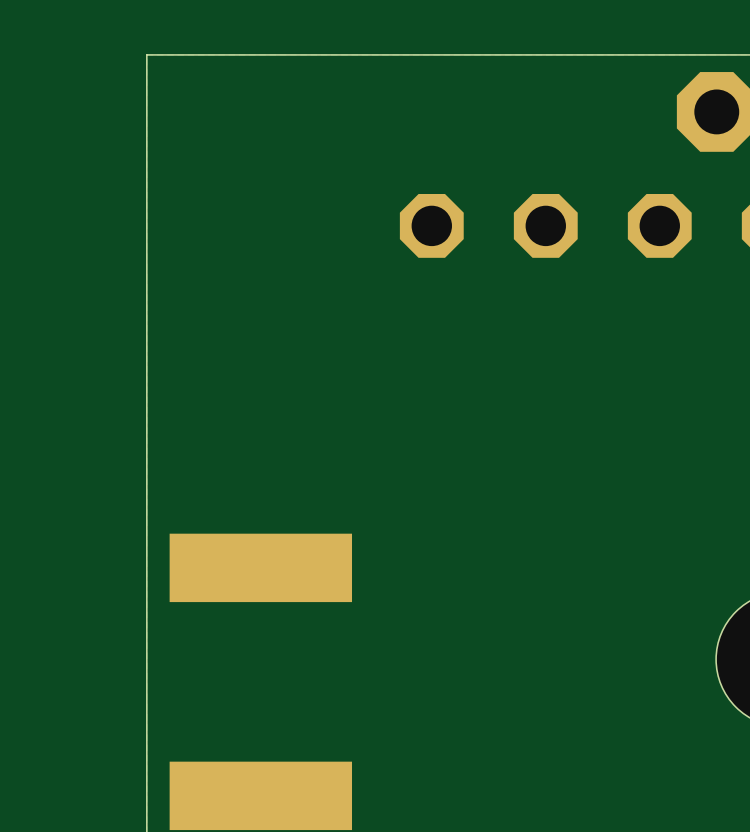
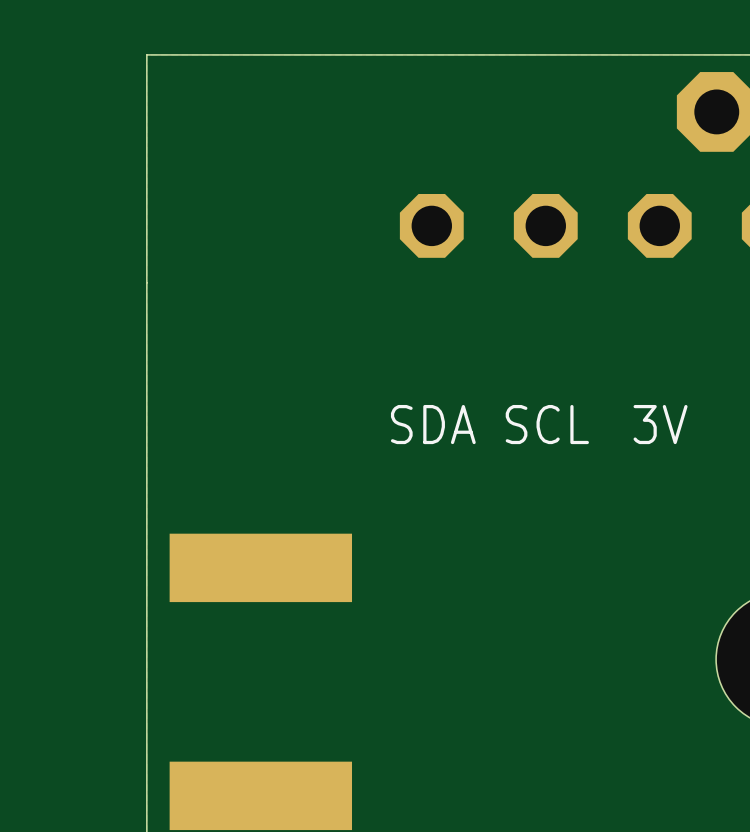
text: none -> SDA (433, 424)
text: none -> SCL (547, 424)
text: none -> 3V (660, 424)

